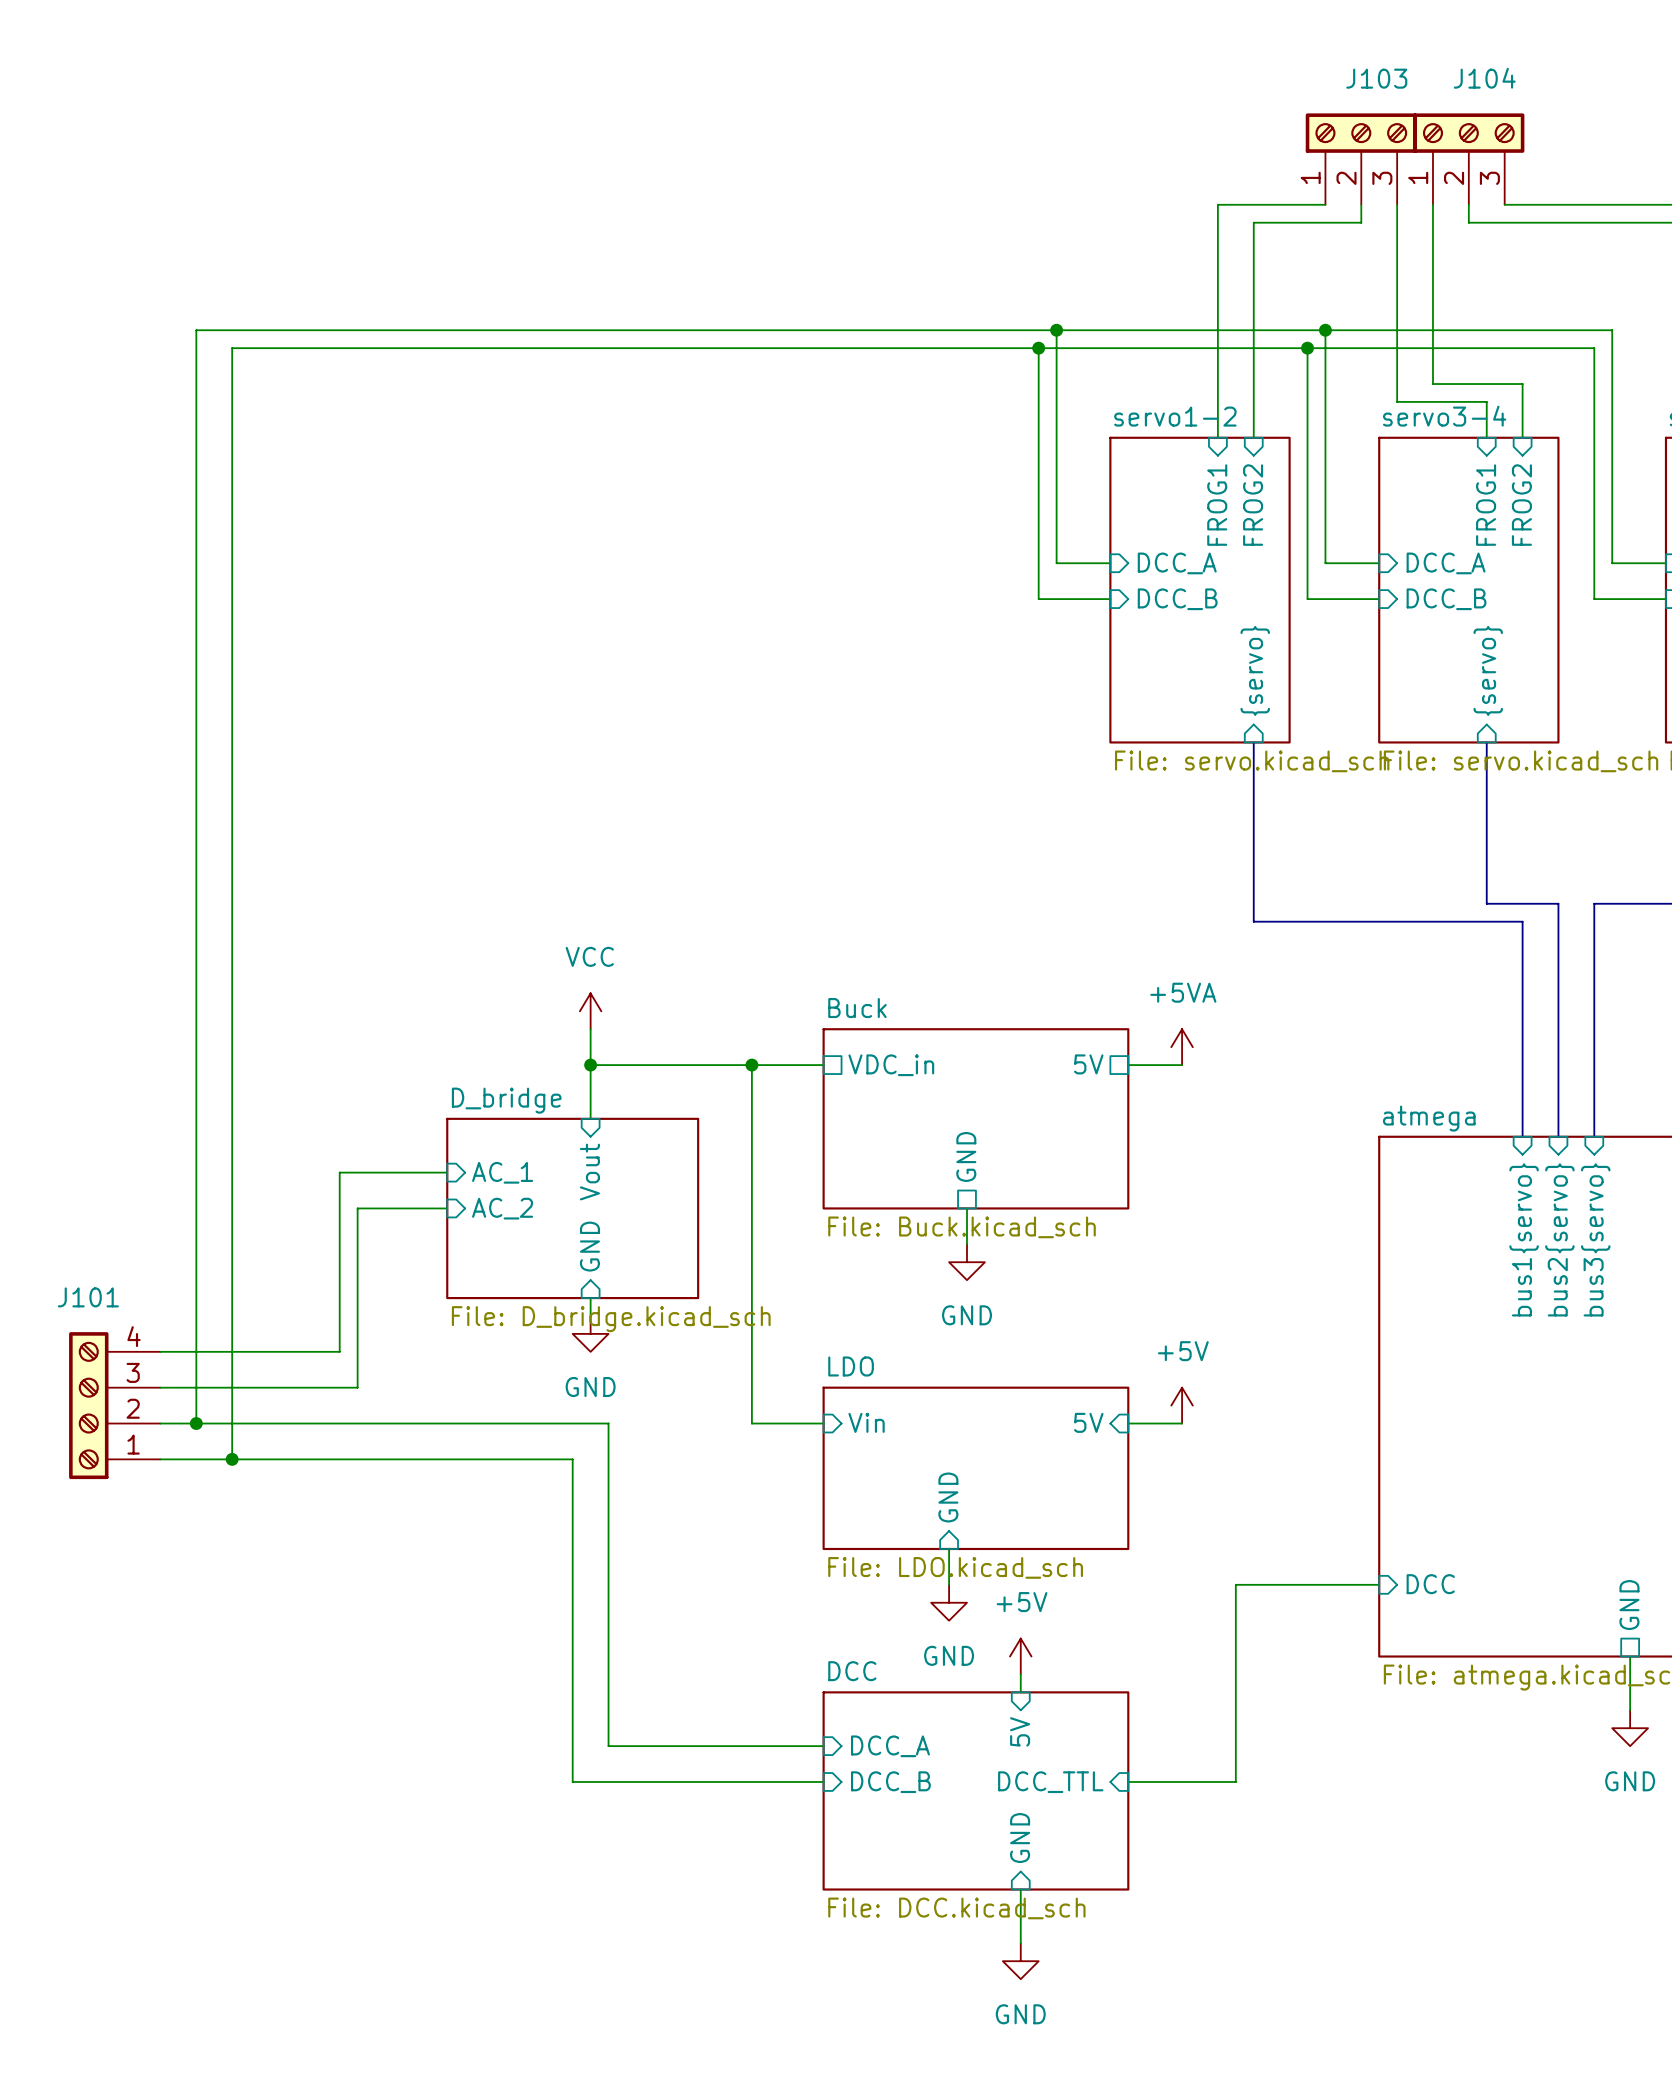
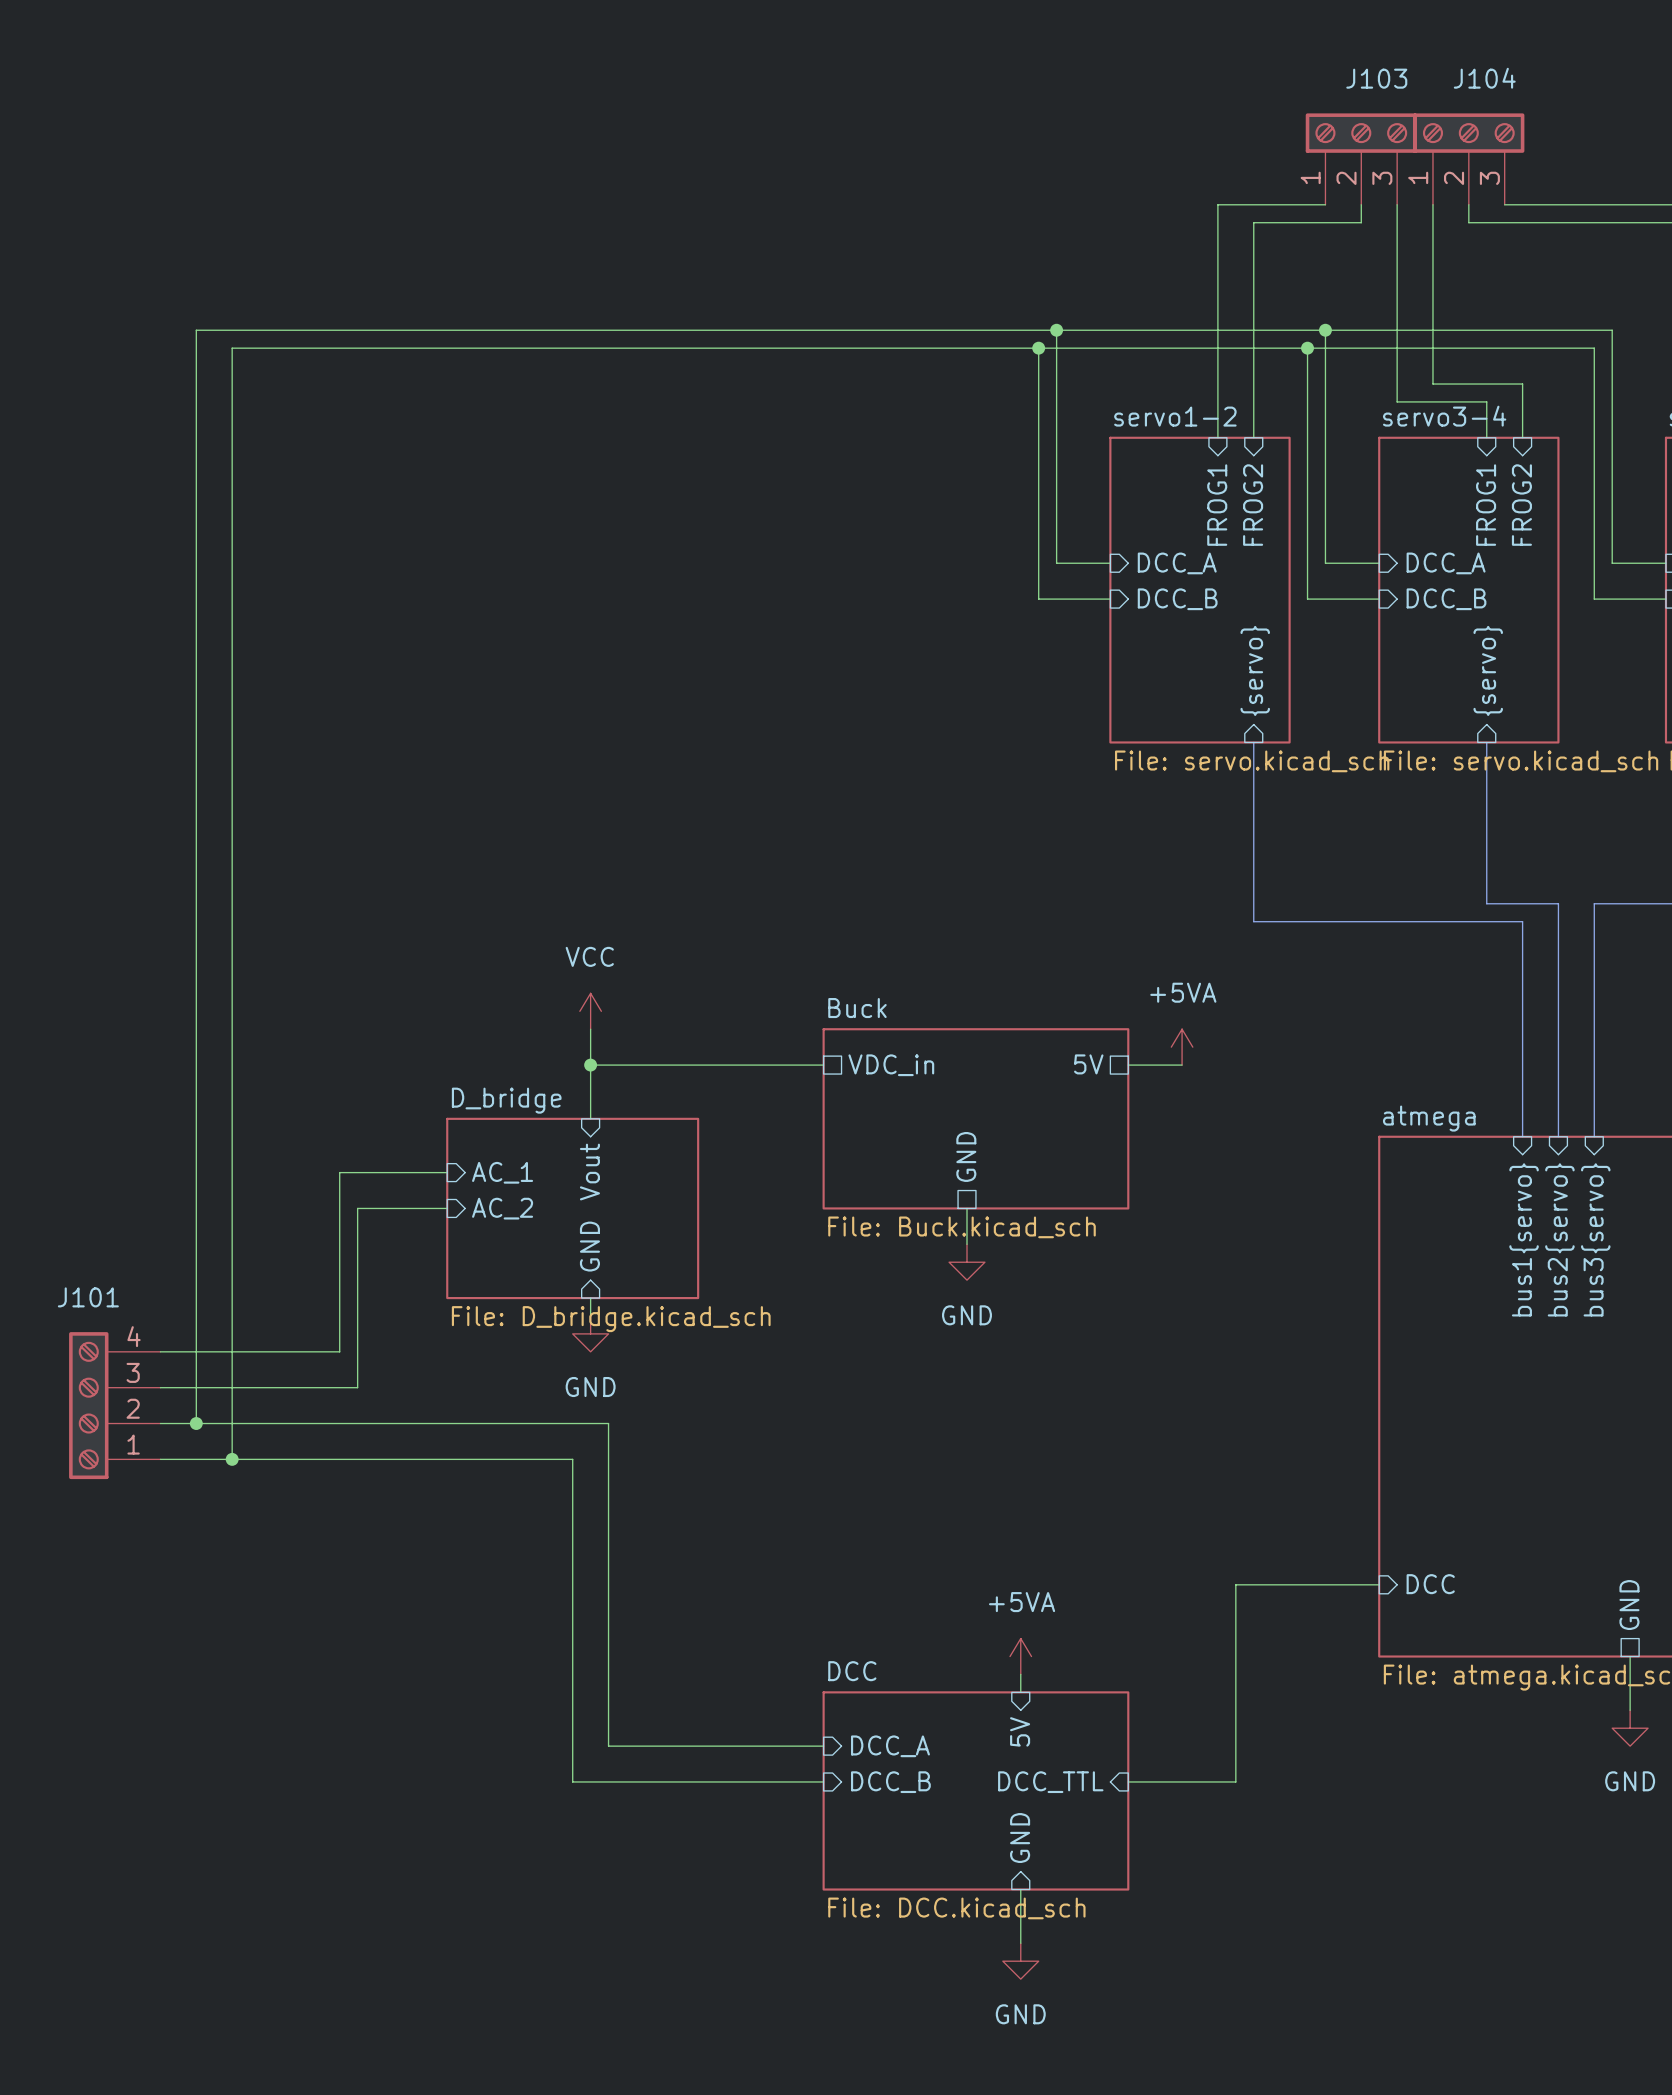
wire: (751, 1065) (751, 1423) (823, 1423) -> none
junction: (751, 1065) -> none
power symbol: +5V (1182, 1405) -> none
sheet pin: Vin (866, 1422) -> none
sheet pin: 5V (1088, 1422) -> none
wire: (1128, 1423) (1182, 1423) -> none
sheet LDO: File: LDO.kicad_sch (975, 1468) -> none
sheet pin: GND (948, 1497) -> none
wire: (949, 1548) (949, 1584) -> none
power symbol: GND (949, 1602) -> none
power symbol: +5V (1020, 1656) -> +5VA (1020, 1656)

